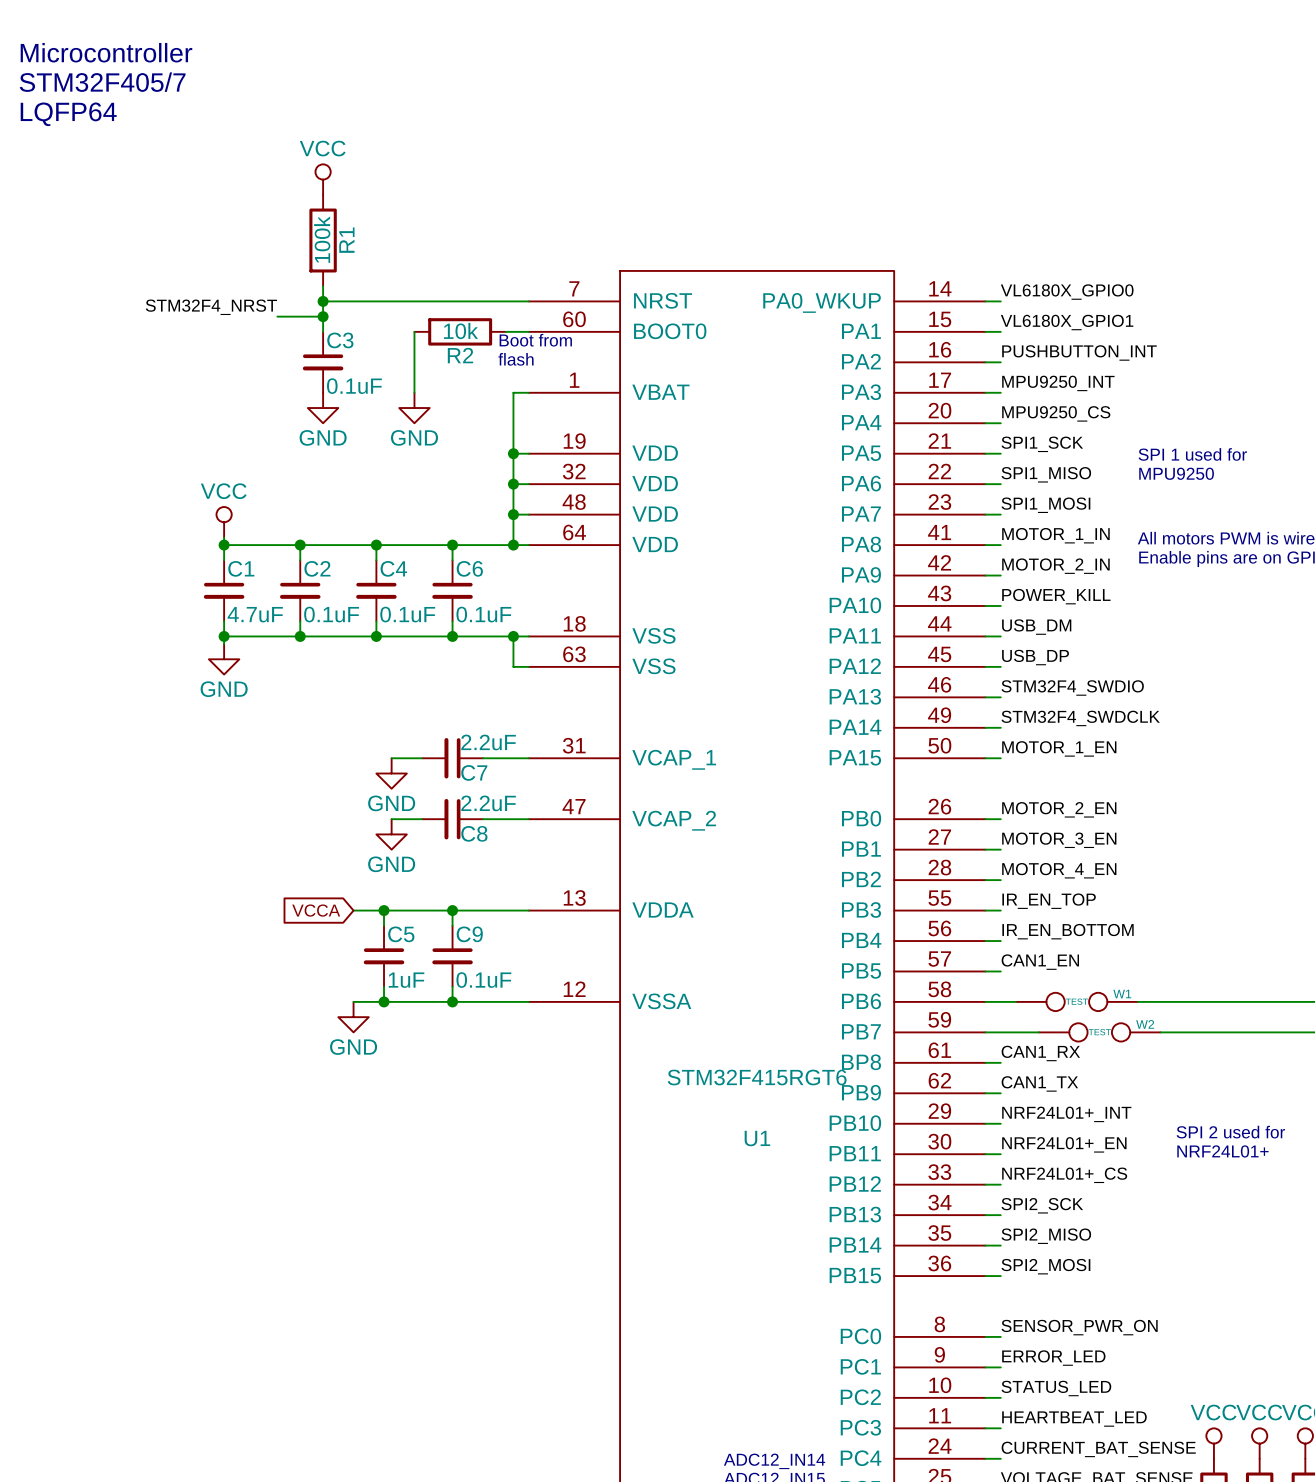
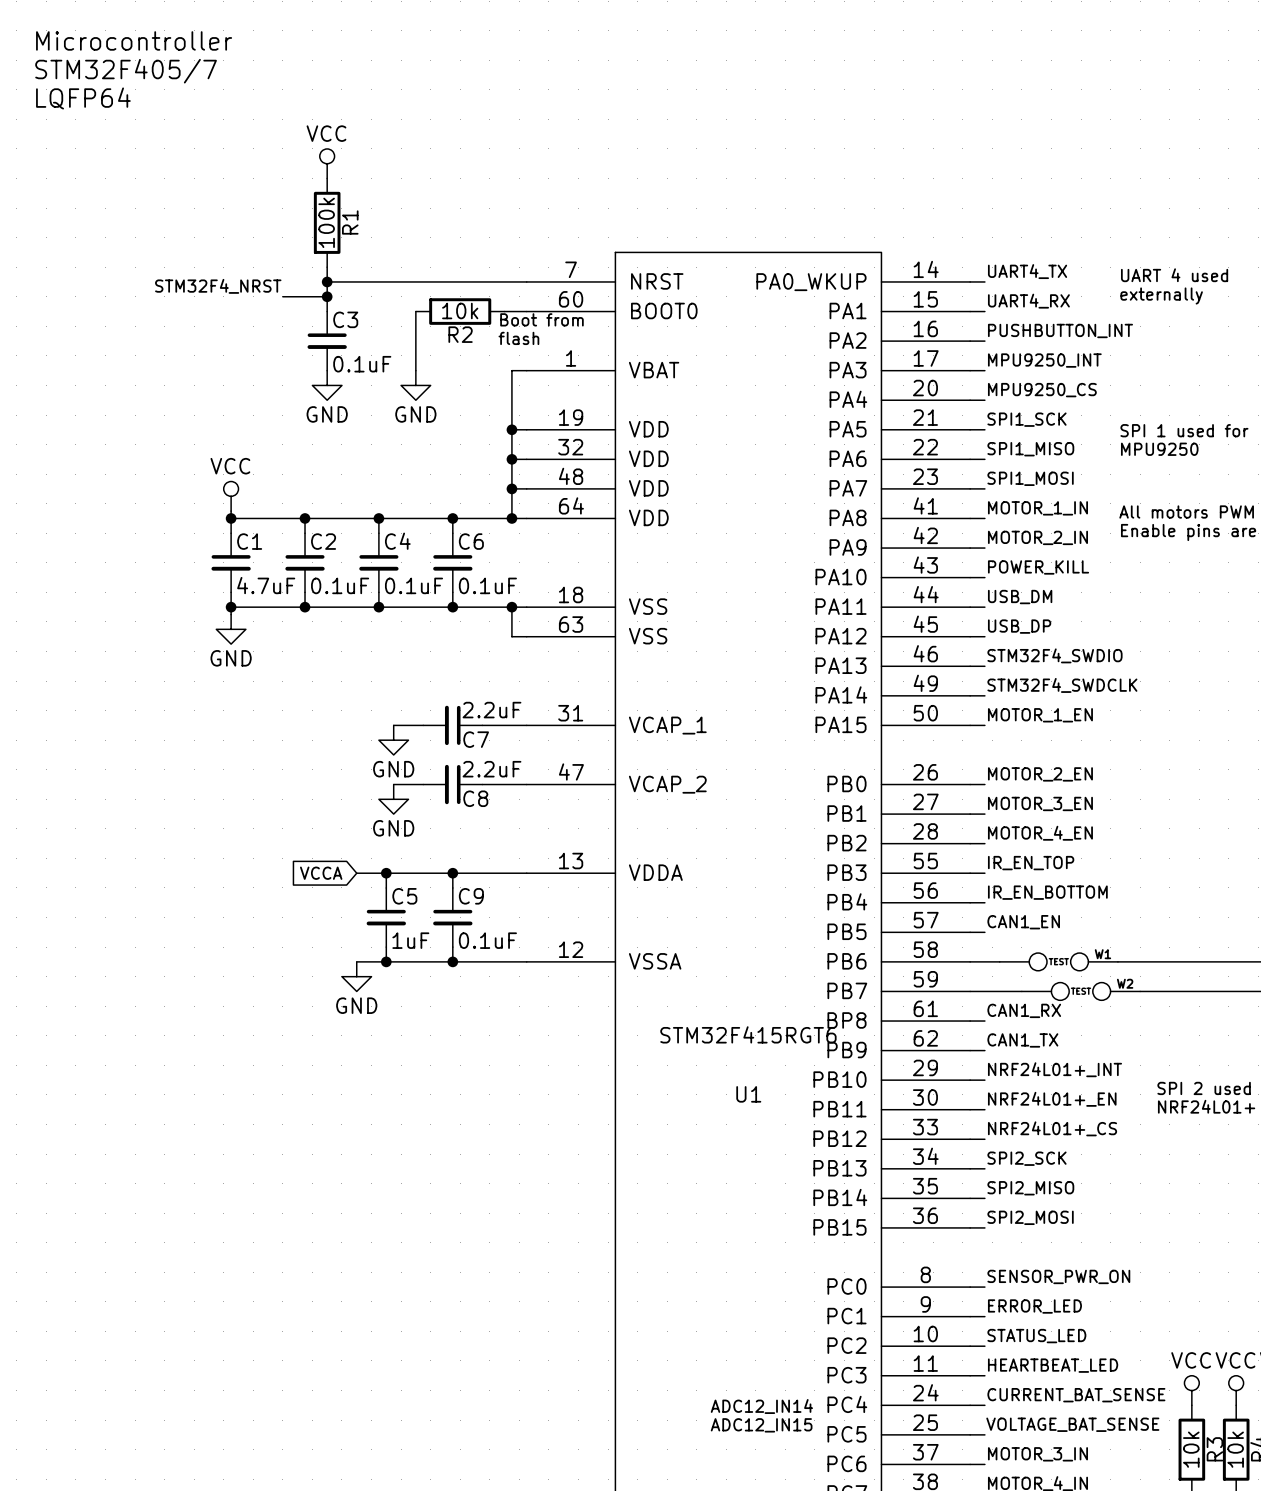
label: VL6180X_GPIO0 (1067, 292) -> UART4_TX (1027, 271)
text: none -> UART 4 used (1174, 275)
text: none -> externally (1161, 295)
label: VL6180X_GPIO1 (1067, 322) -> UART4_RX (1028, 301)

